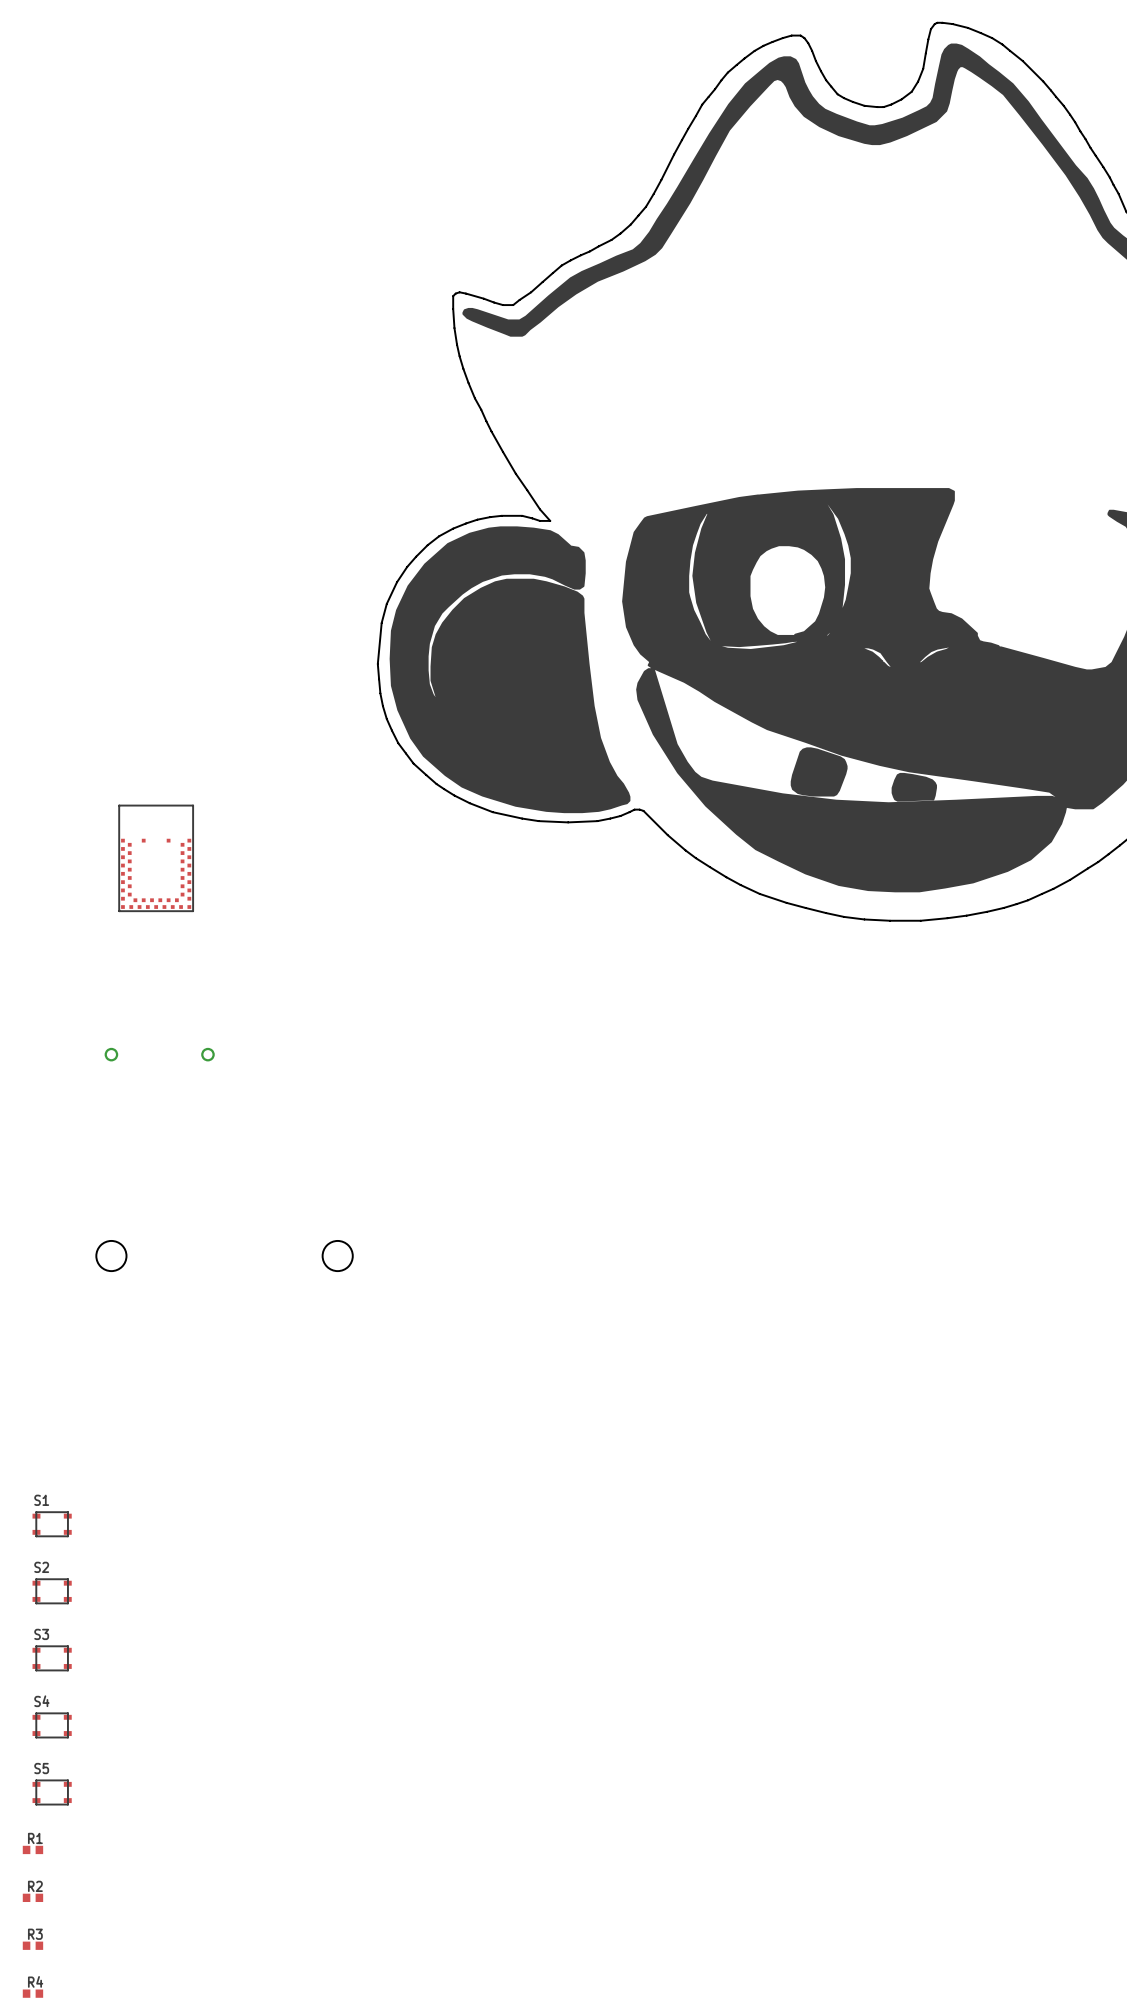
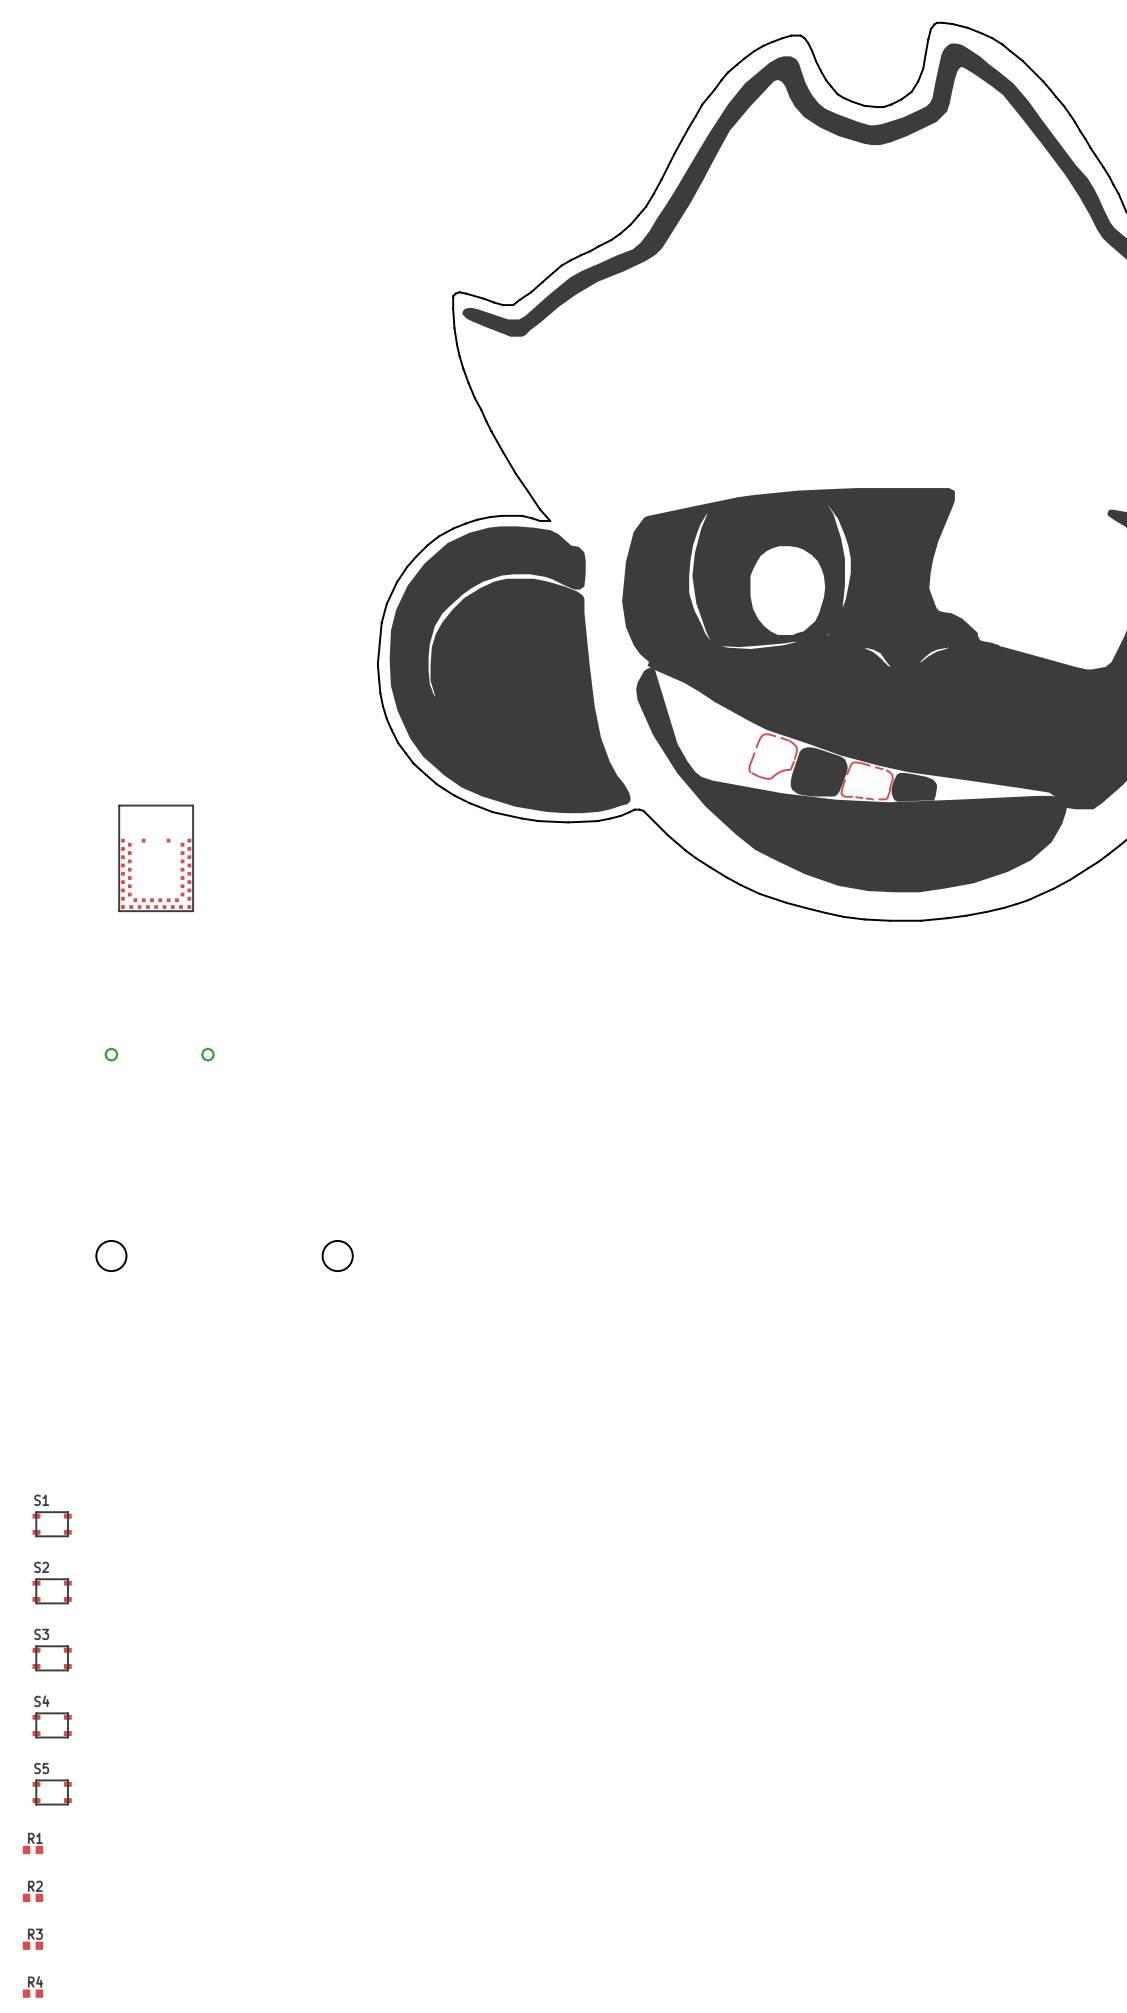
zone outline: none -> (764, 734) (759, 739) (749, 766) (749, 771) (758, 776) (769, 778) (781, 771) (790, 770) (796, 747) (789, 740) (764, 734)
zone outline: none -> (854, 762) (847, 772) (841, 794) (845, 796) (886, 799) (892, 775) (886, 770) (854, 762)

